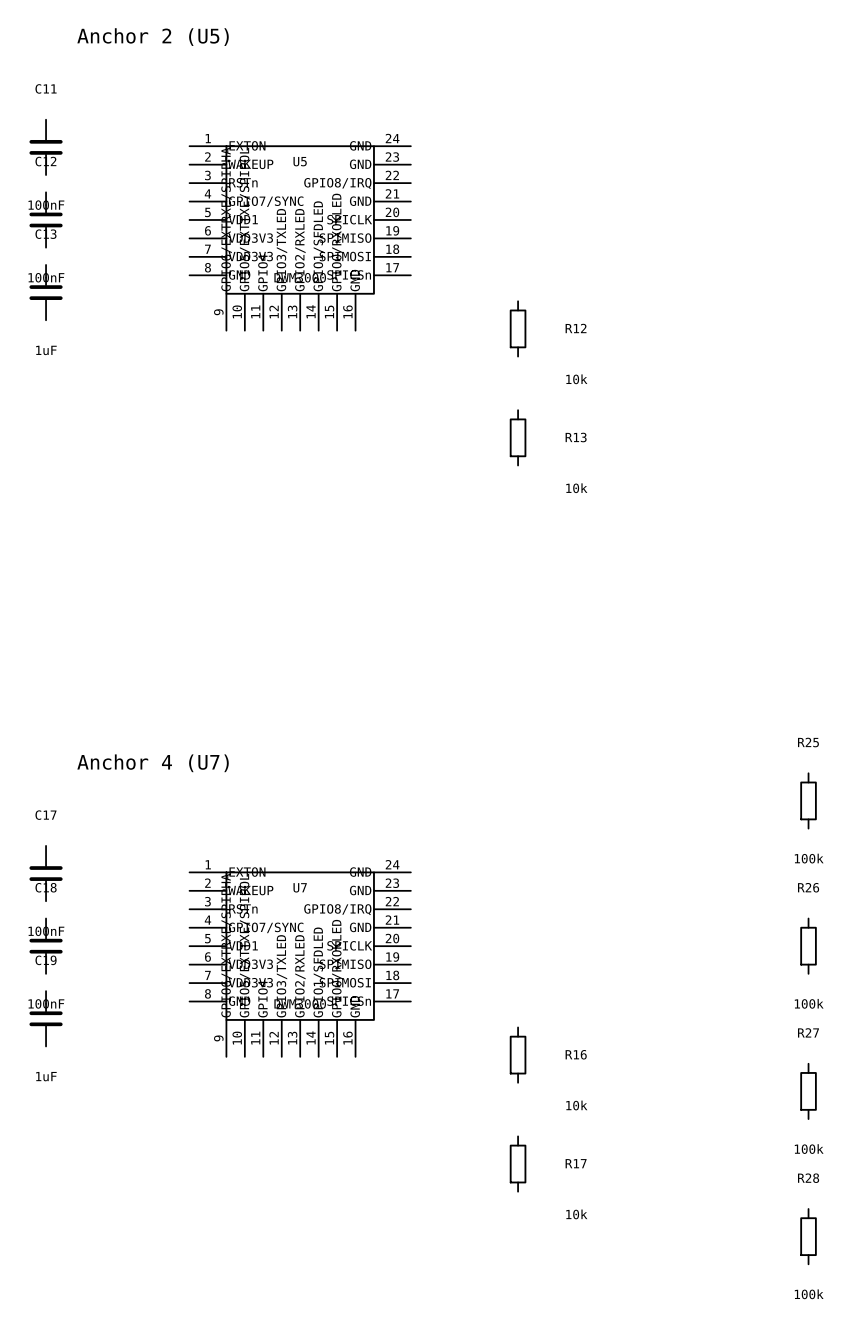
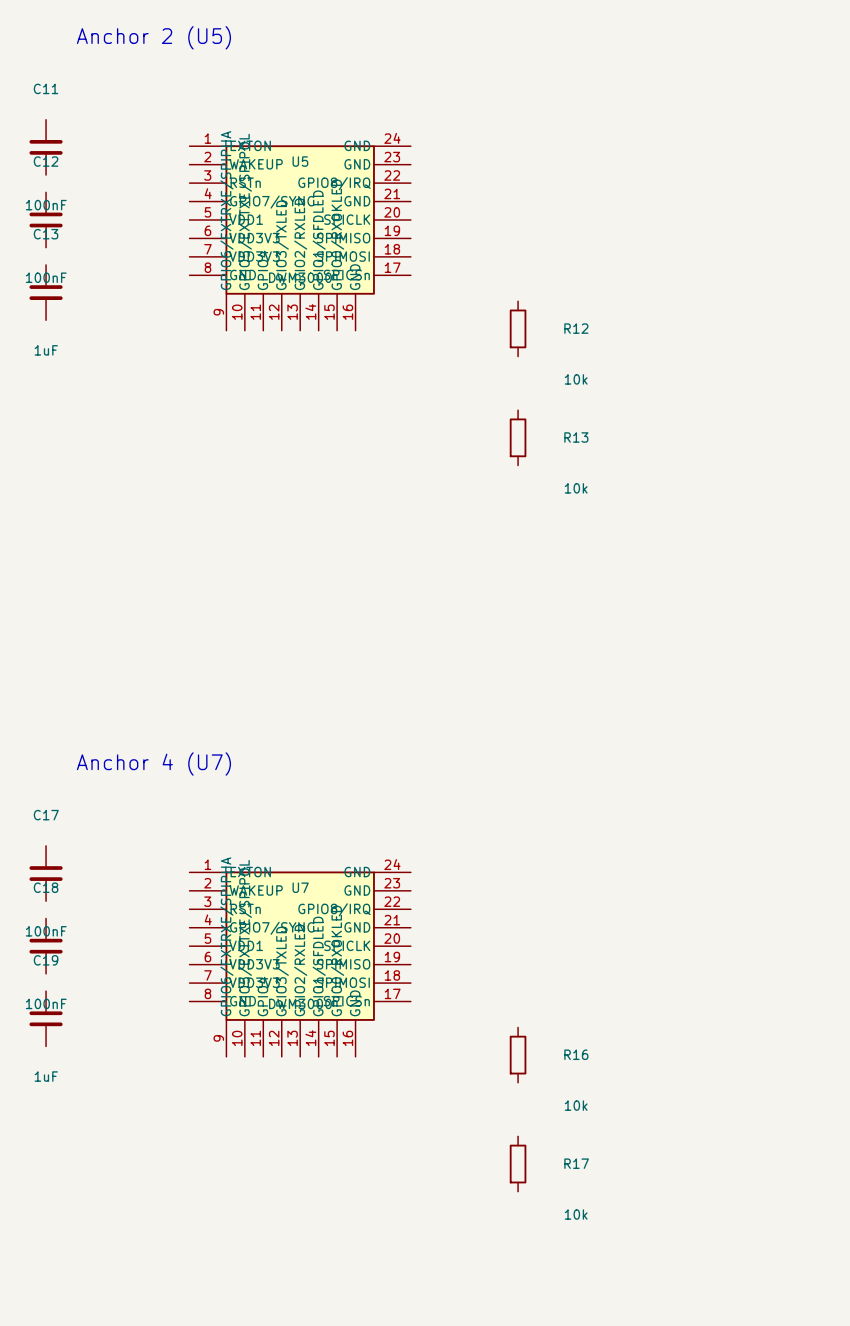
R25: 100k (808, 800) -> none
R26: 100k (808, 946) -> none
R27: 100k (808, 1091) -> none
R28: 100k (808, 1236) -> none

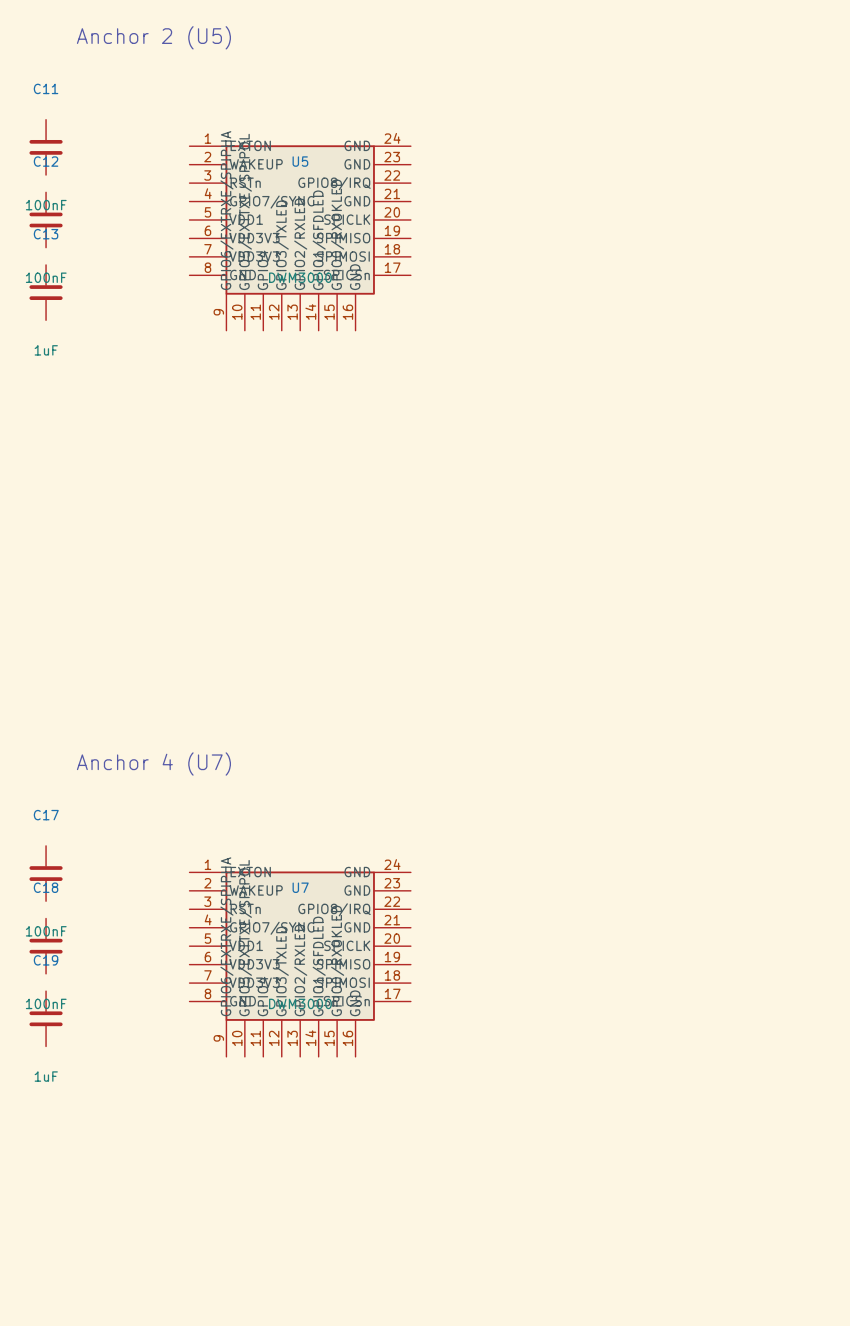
R12: 10k (518, 328) -> none
R13: 10k (518, 437) -> none
R16: 10k (518, 1055) -> none
R17: 10k (518, 1164) -> none

